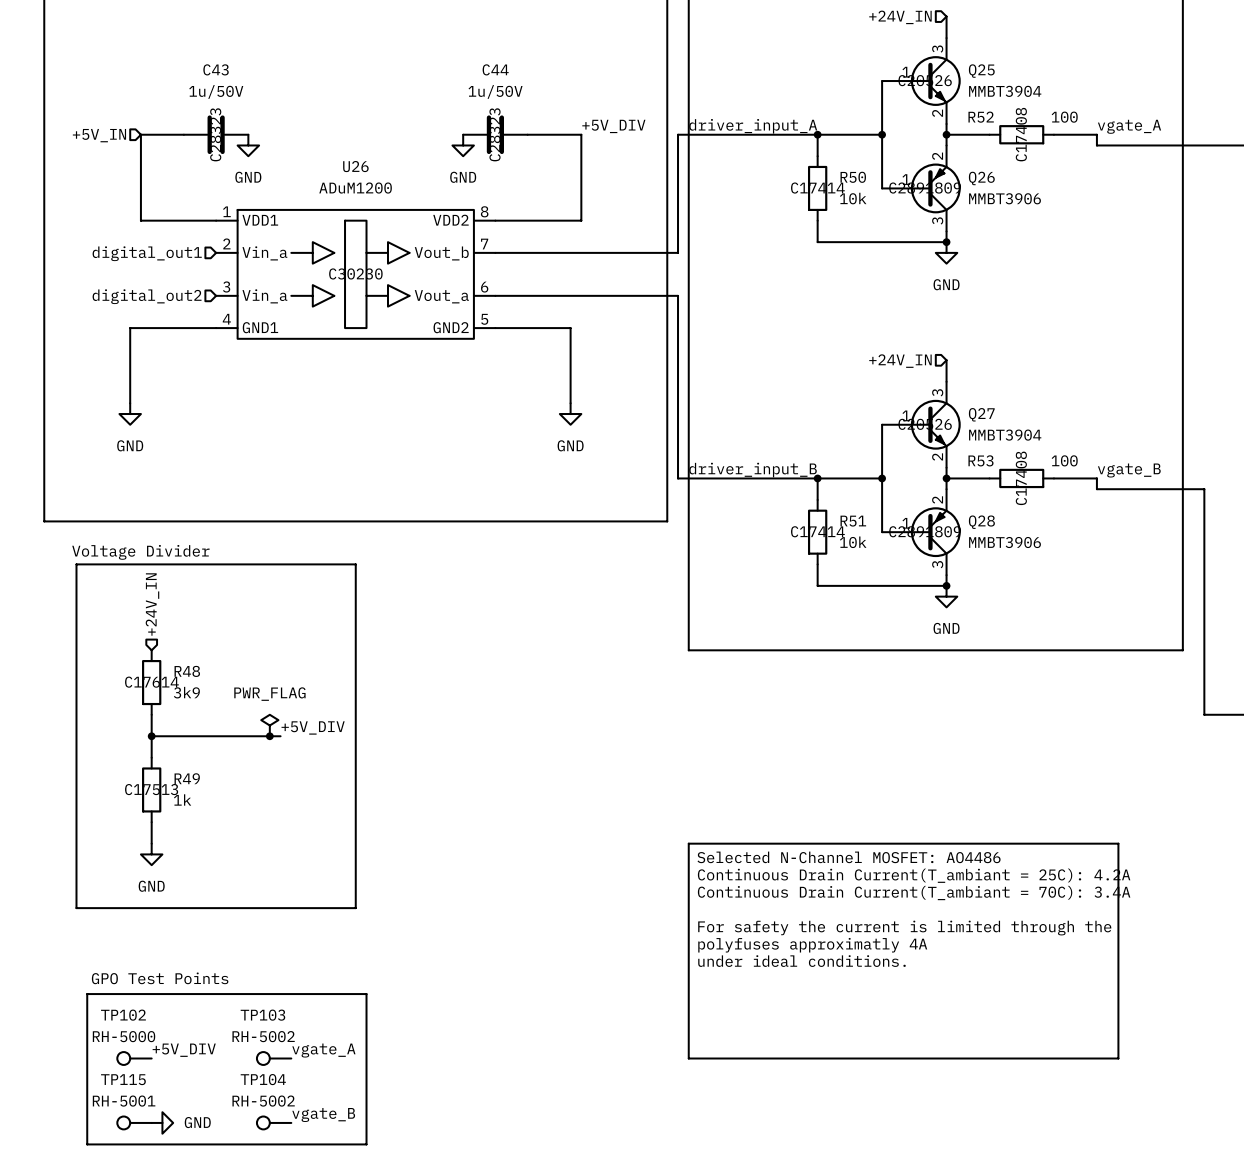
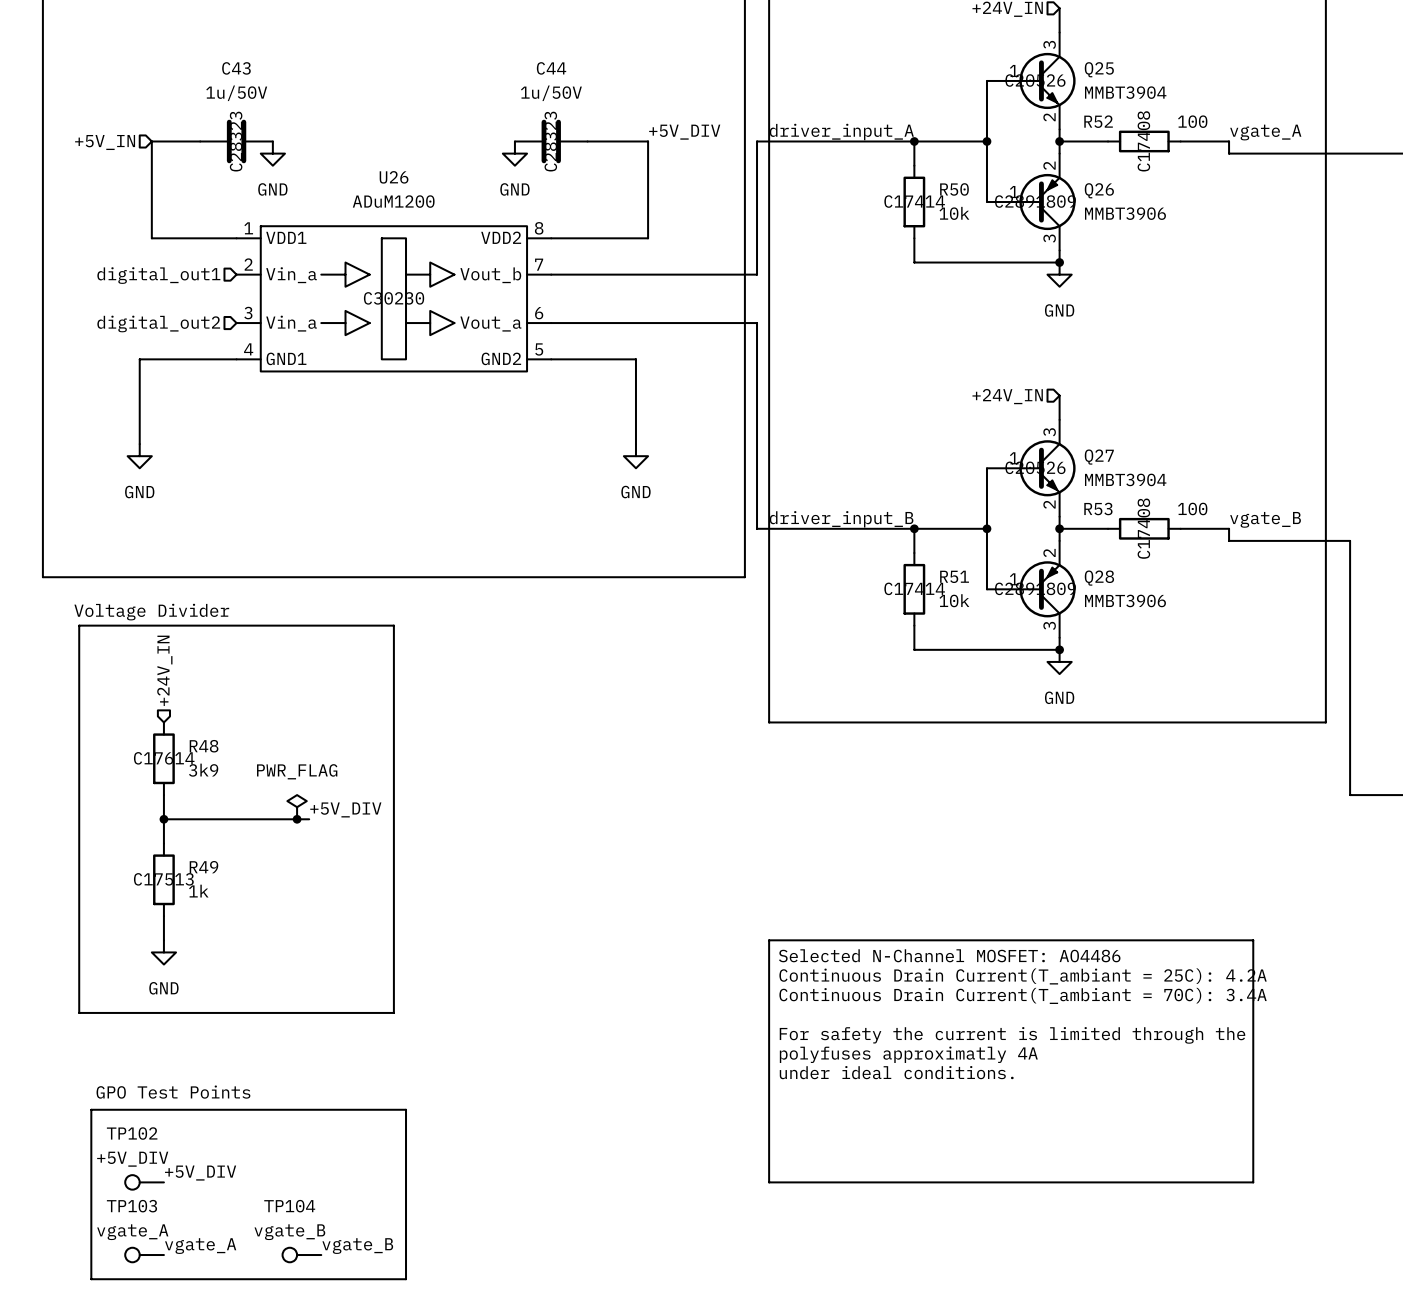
TP102 value: RH-5000 (124, 1036) -> +5V_DIV (132, 1159)
label position: vgate_A (323, 1050) -> vgate_A (200, 1246)
TP103: RH-5002 (274, 1058) -> none
TP115 name: TP115 (123, 1079) -> TP103 (131, 1206)
TP115 value: RH-5001 (124, 1101) -> vgate_A (132, 1232)
TP104 value: RH-5002 (263, 1101) -> vgate_B (289, 1232)
power symbol: GND (162, 1122) -> none

